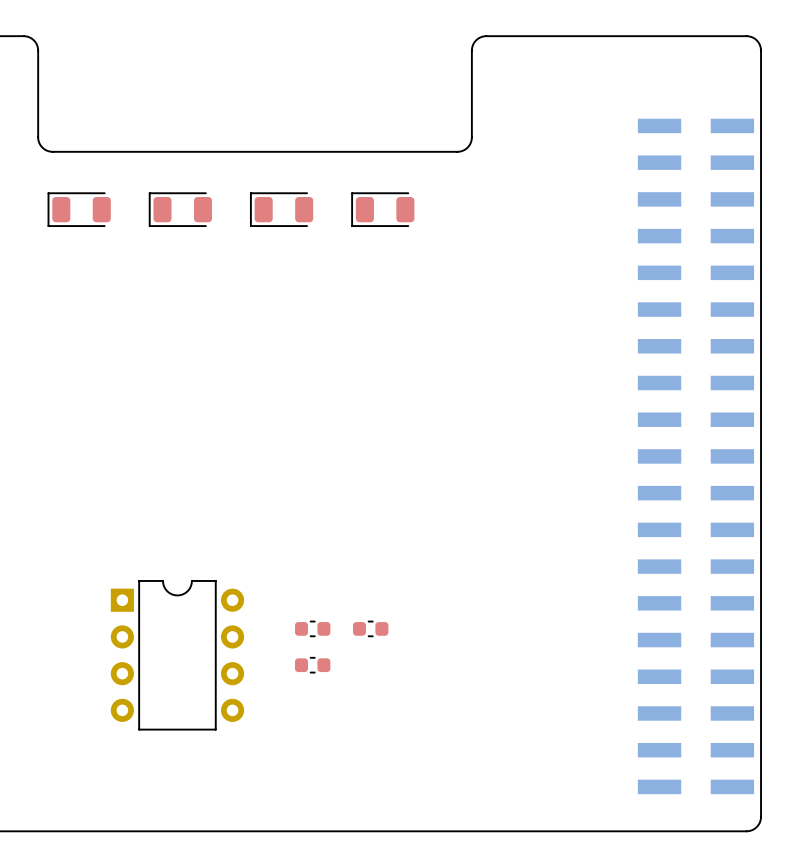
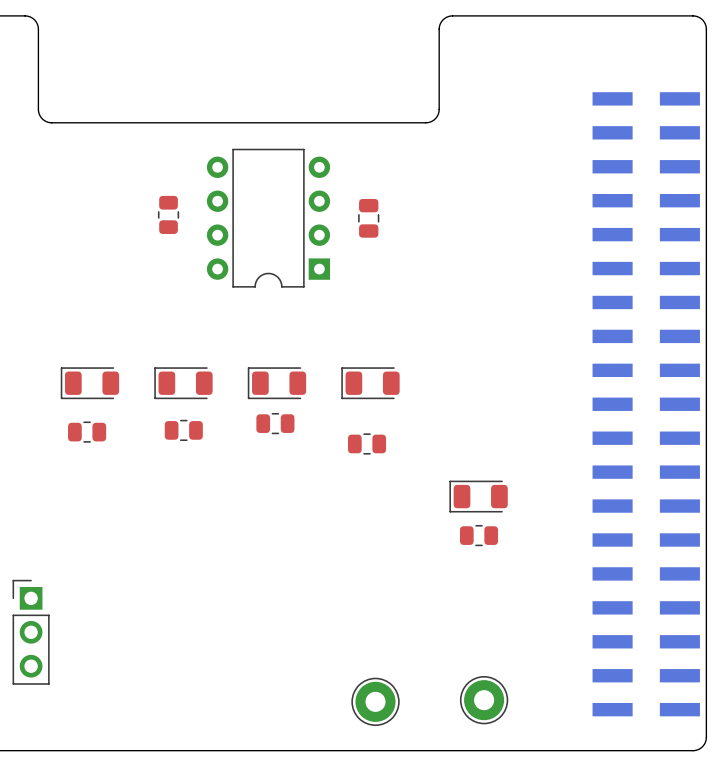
part: (79, 209) -> none
part: (180, 209) -> none
part: (281, 209) -> none
part: (382, 209) -> none
part: none -> (168, 214)
part: none -> (268, 218)
part: none -> (368, 218)
part: none -> (89, 383)
part: none -> (183, 383)
part: none -> (276, 383)
part: none -> (370, 383)
part: none -> (275, 423)
part: none -> (183, 430)
part: none -> (87, 432)
part: none -> (367, 443)
part: none -> (478, 496)
part: none -> (479, 535)
part: (312, 628) -> none
part: (370, 628) -> none
part: (177, 655) -> none
part: (312, 665) -> none
part: none -> (31, 632)
part: none -> (484, 700)
part: none -> (375, 701)

